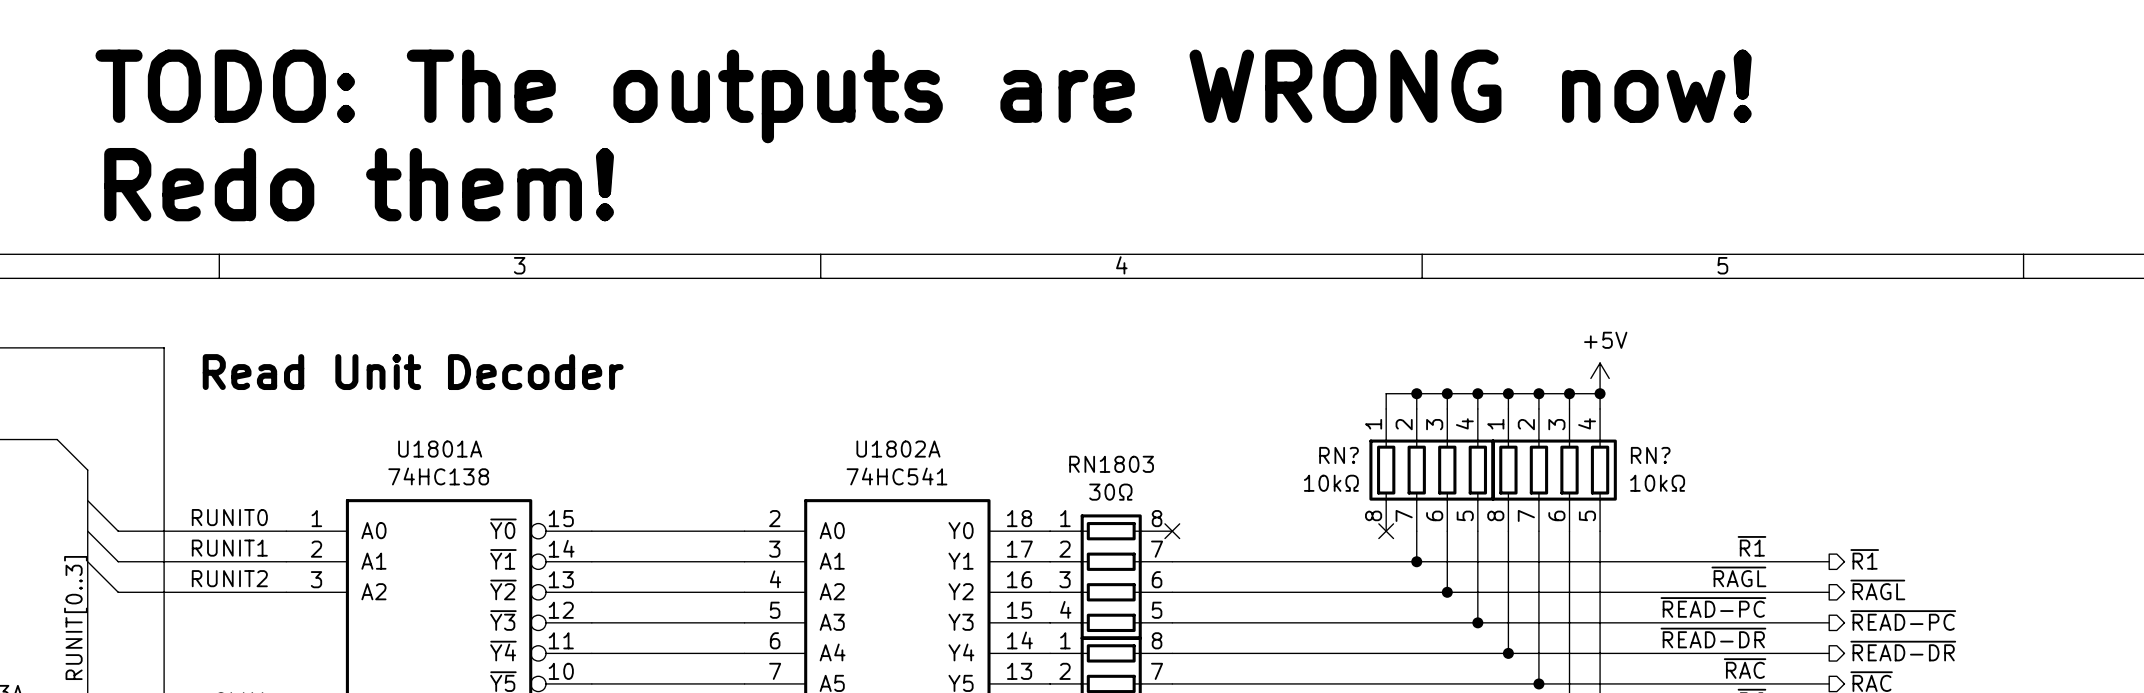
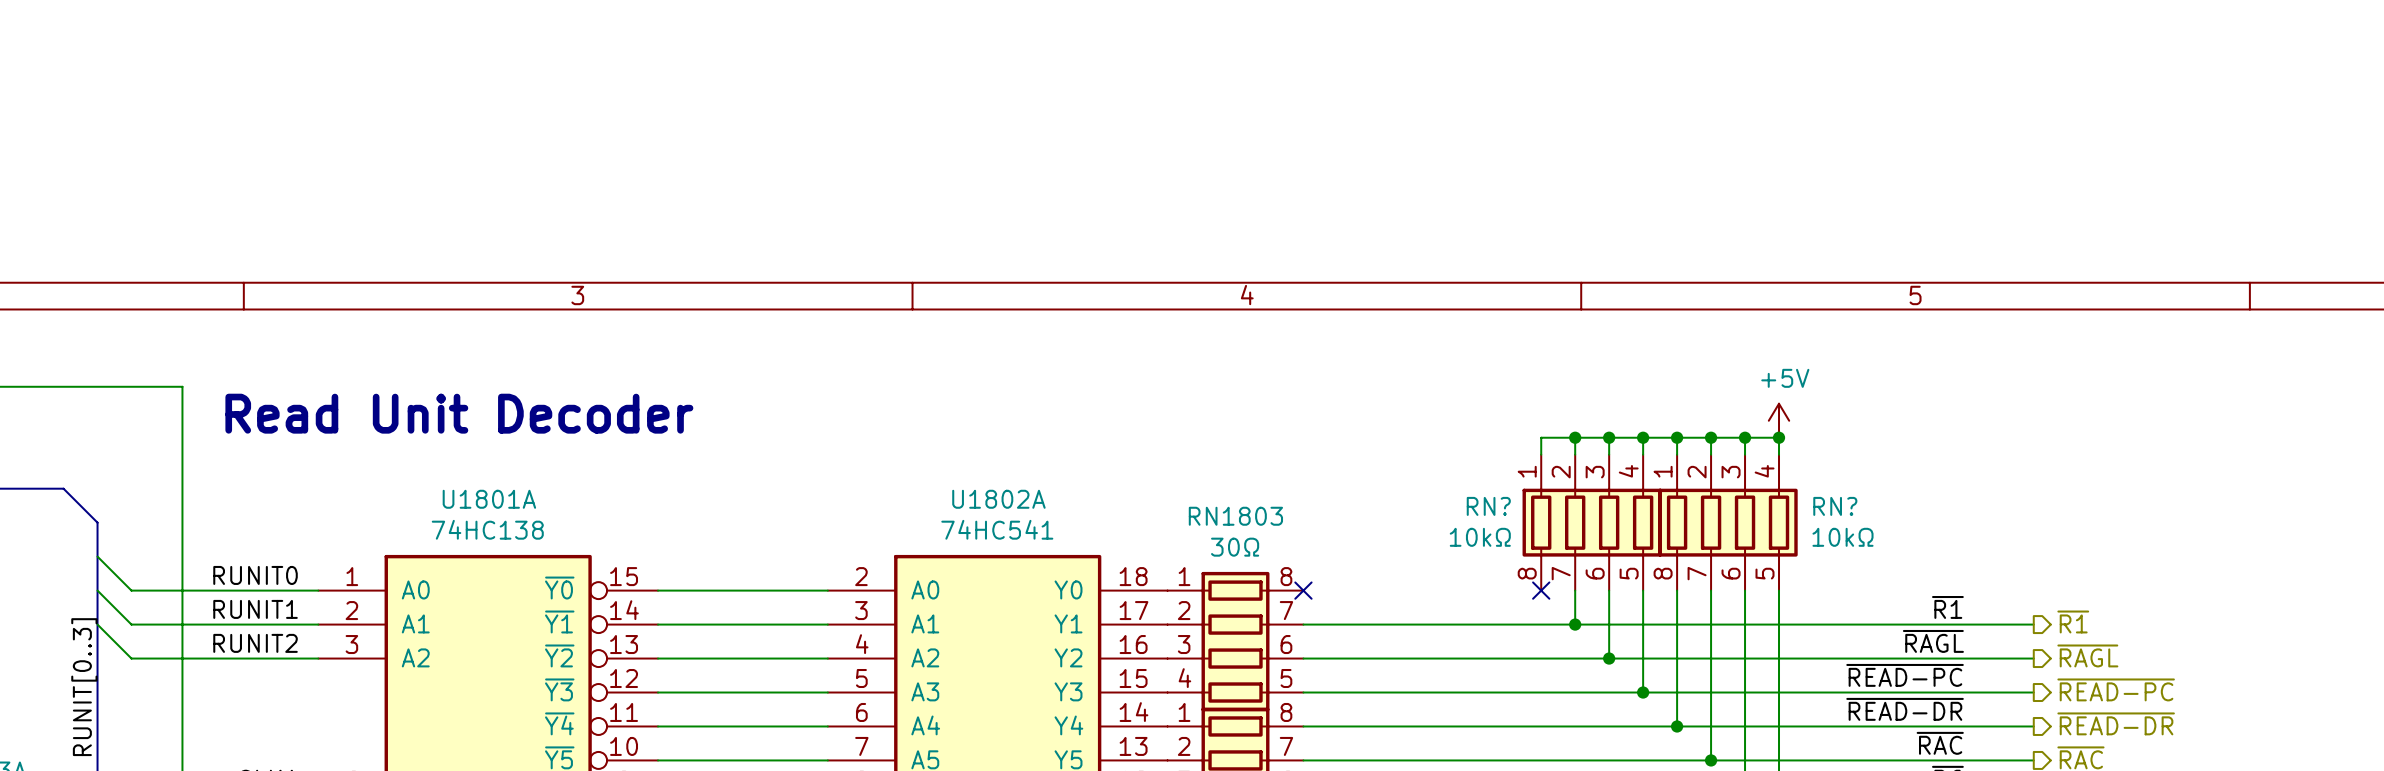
text: TODO: The outputs are WRONG now! (923, 96) -> none
text: Redo them! (359, 184) -> none

